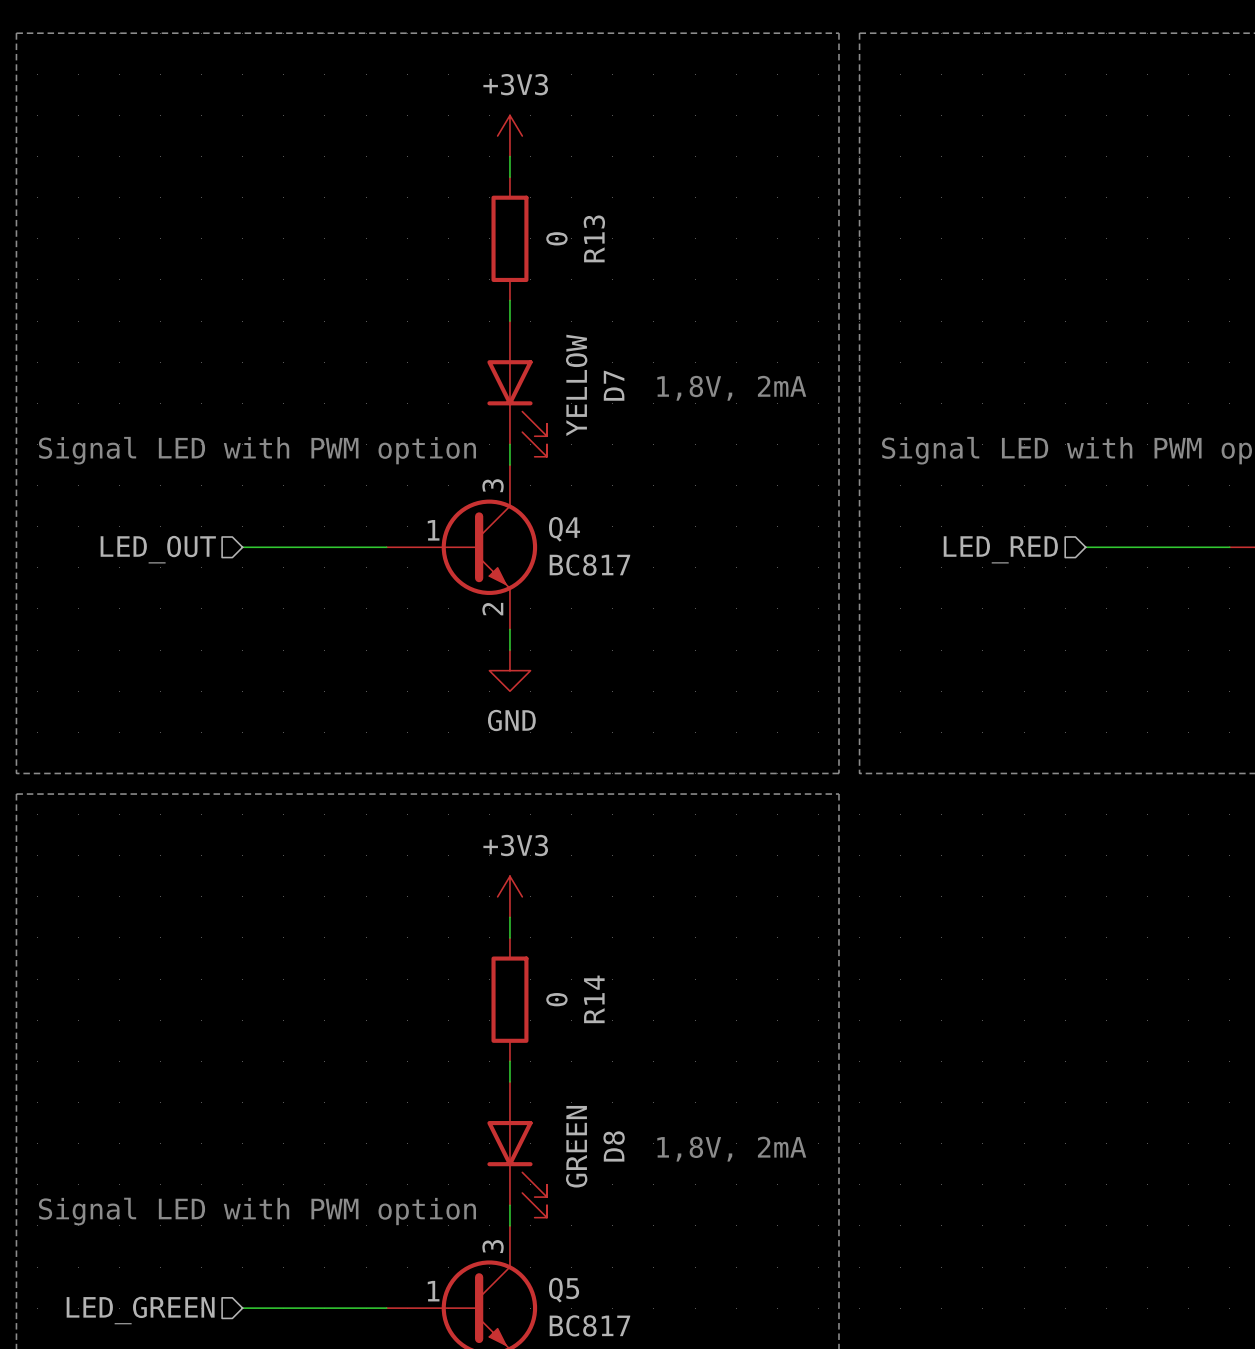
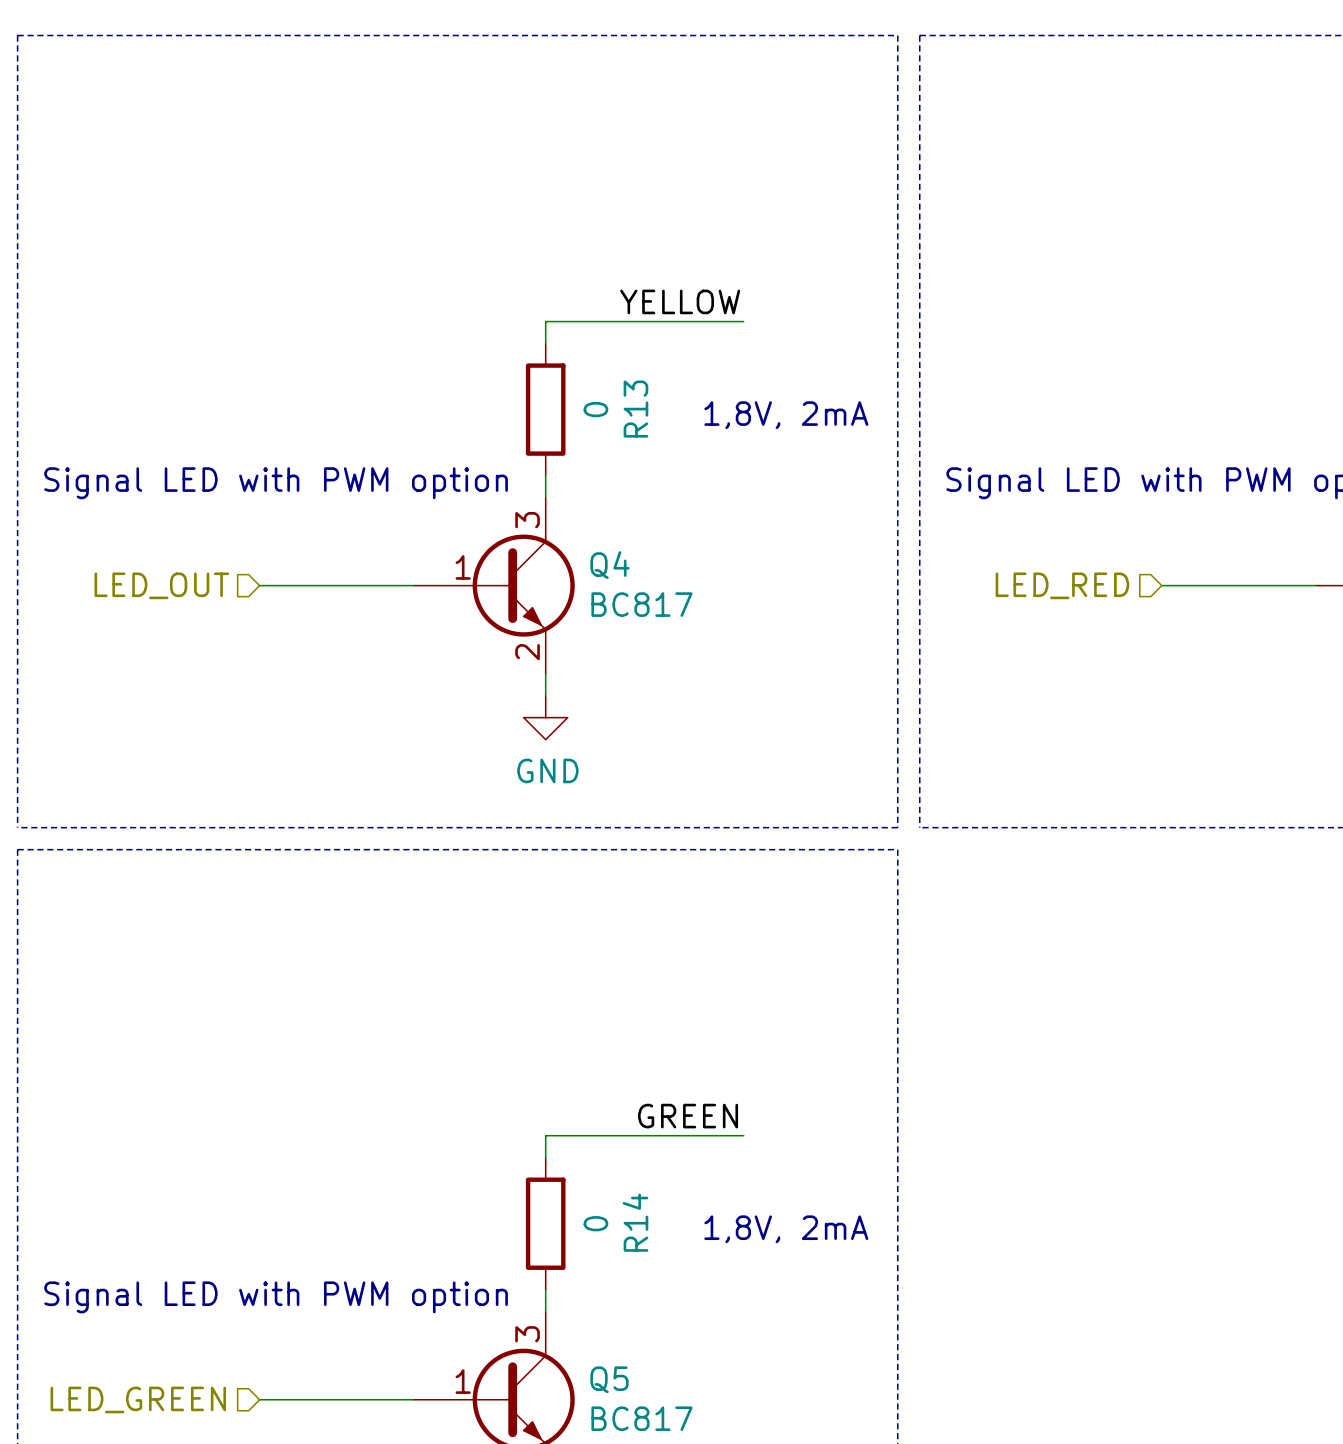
power symbol: +3V3 (509, 136) -> none
wire: (509, 156) (509, 177) -> none
R13 position: (509, 238) -> (545, 409)
label: none -> YELLOW (680, 301)
wire: none -> (545, 321) (743, 321)
D7: YELLOW (517, 388) -> none
power symbol: +3V3 (509, 896) -> none
wire: (509, 917) (509, 937) -> none
R14 position: (509, 999) -> (545, 1223)
label: none -> GREEN (688, 1116)
wire: none -> (545, 1135) (743, 1135)
D8: GREEN (517, 1149) -> none

